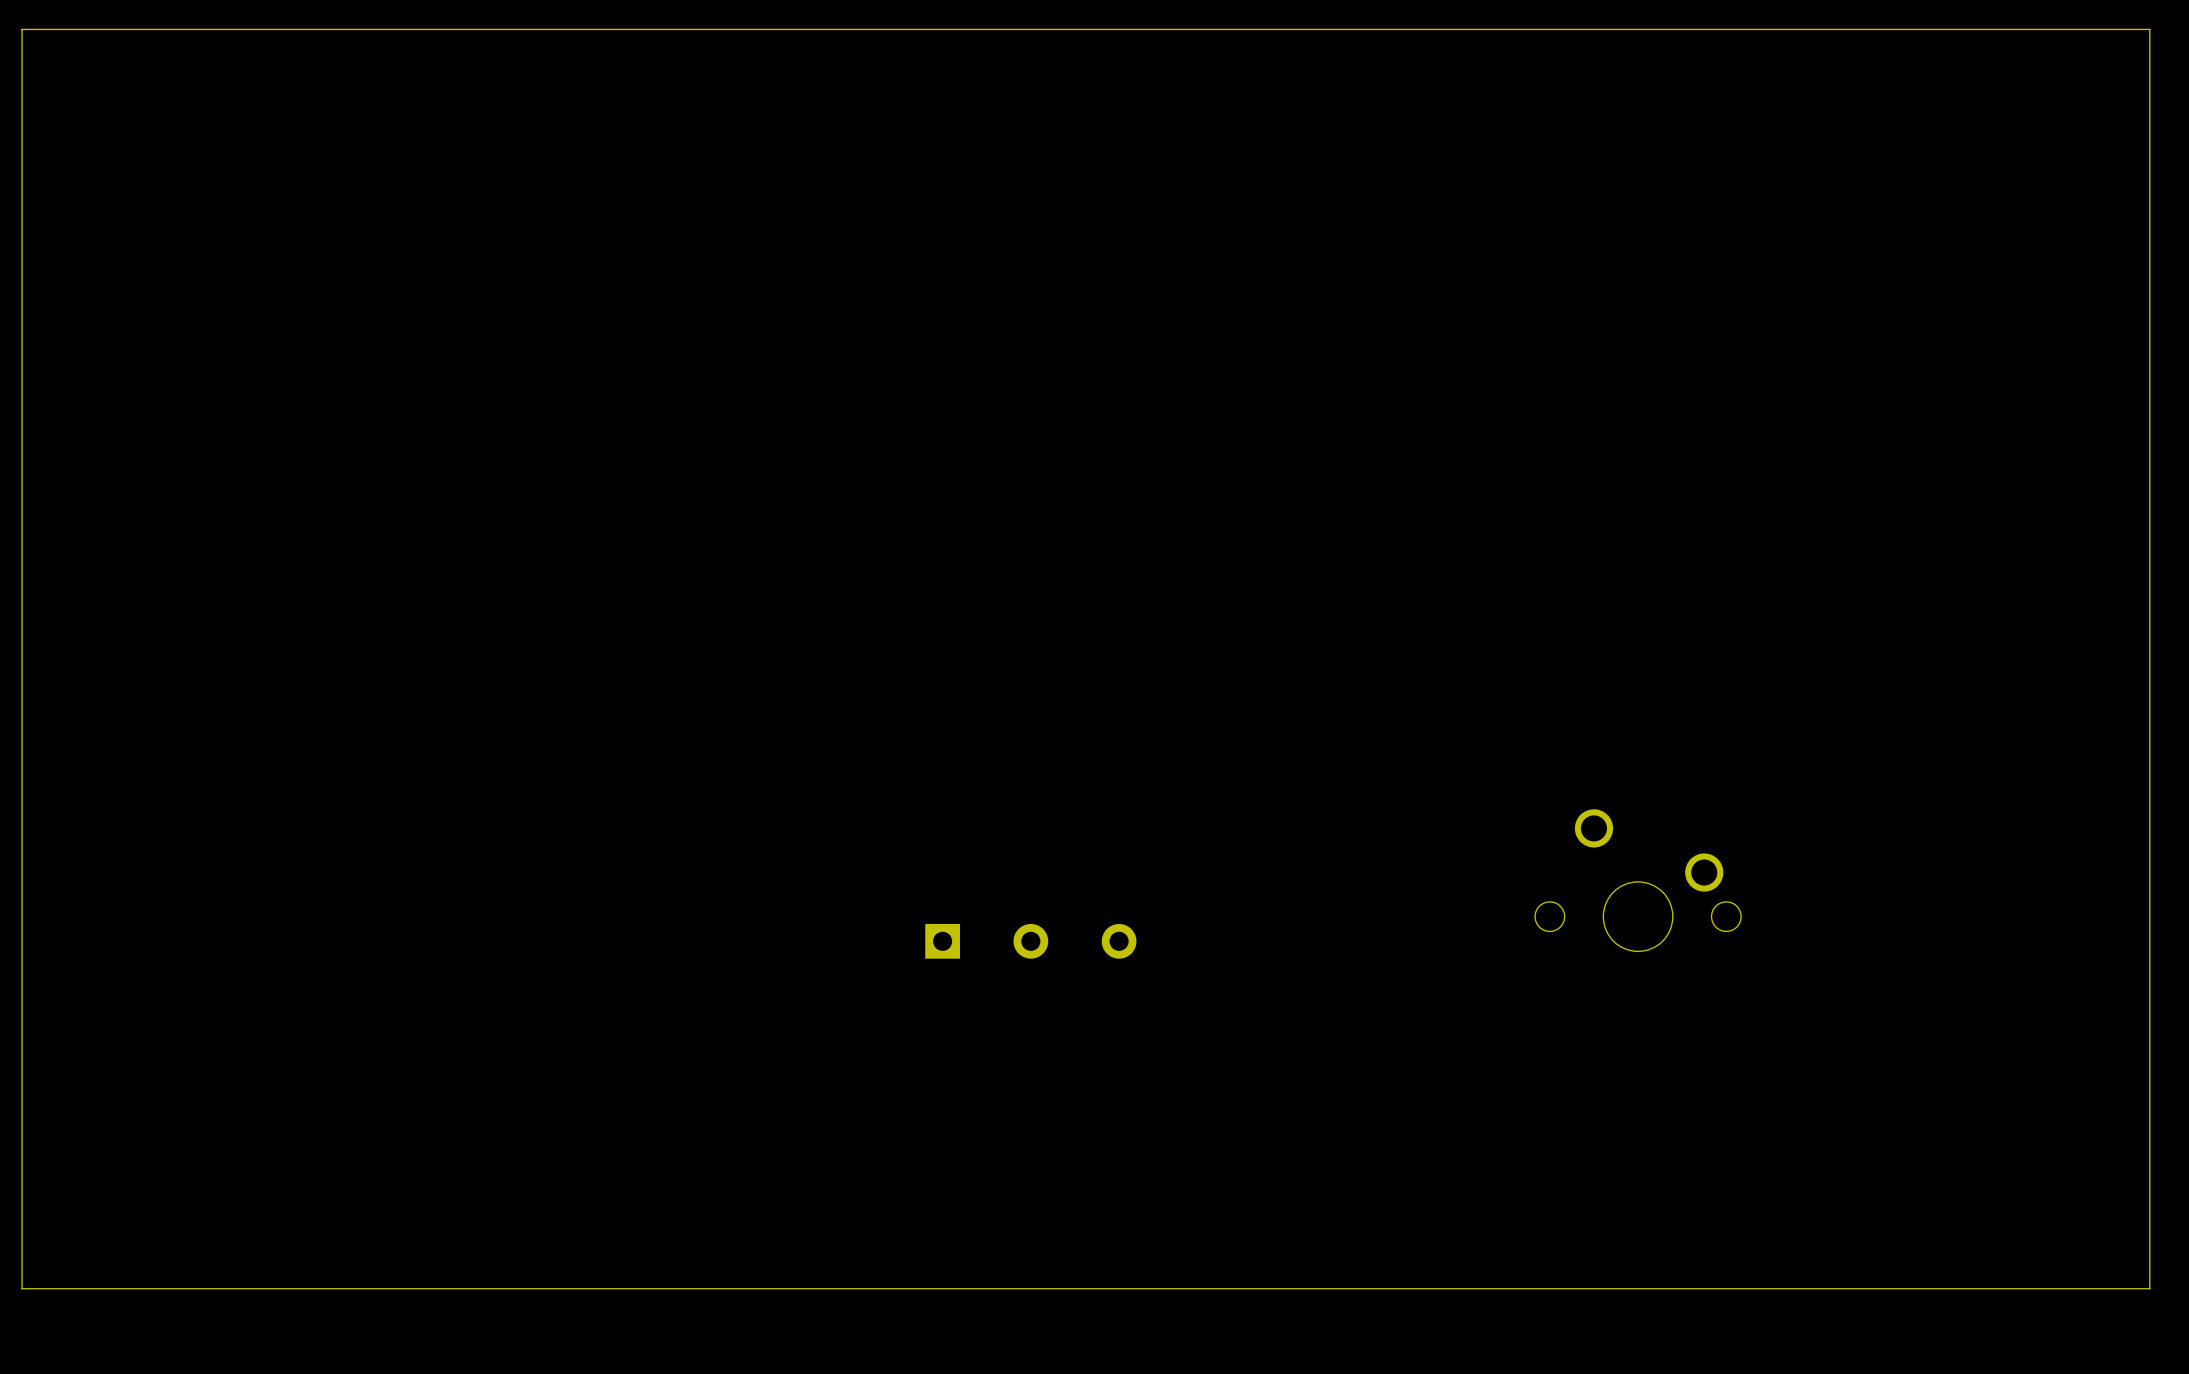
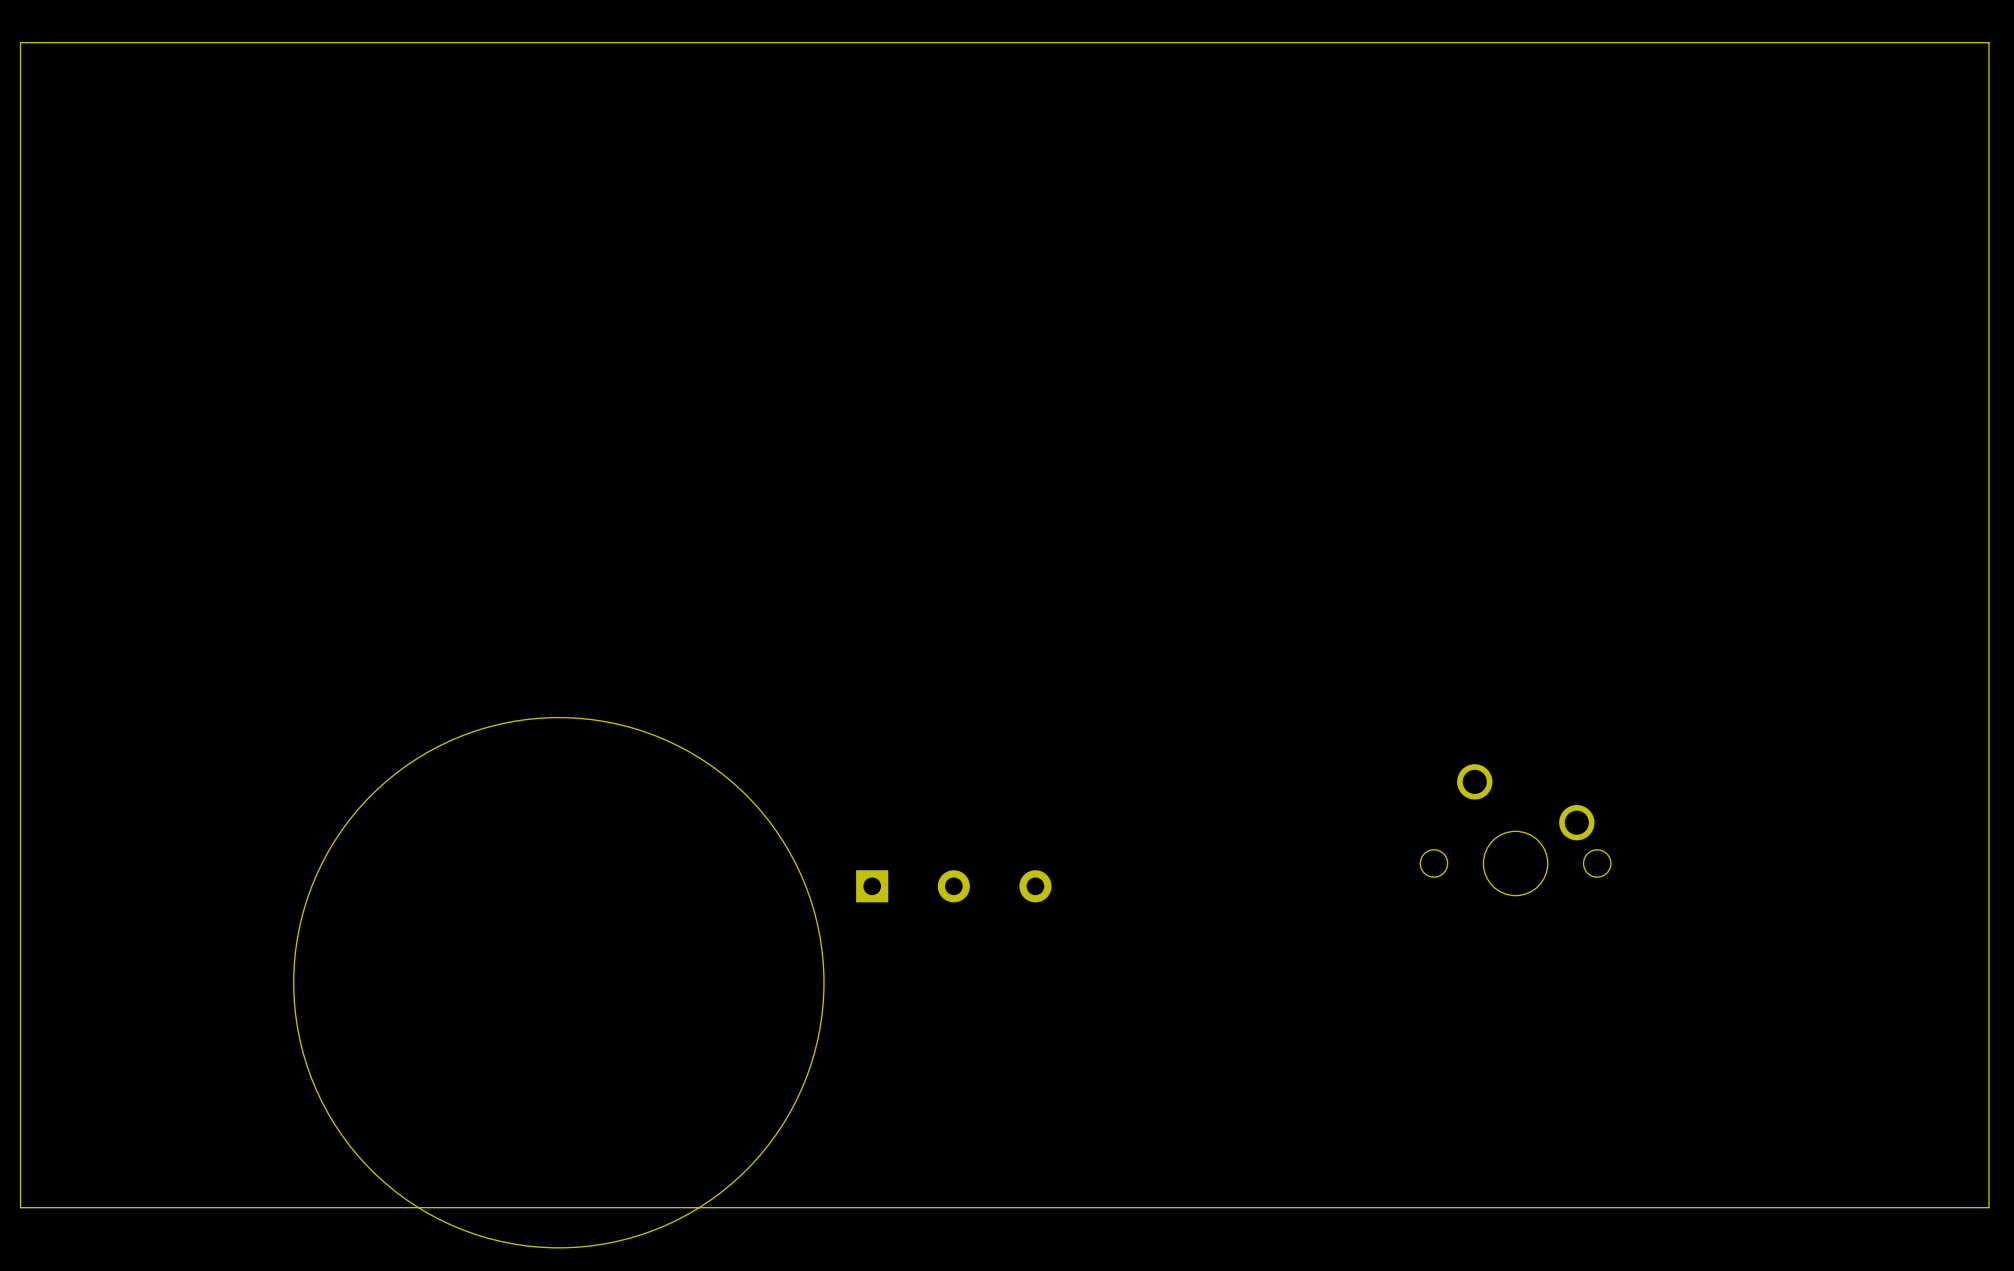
round board edge: none -> [293, 717, 825, 1249]

